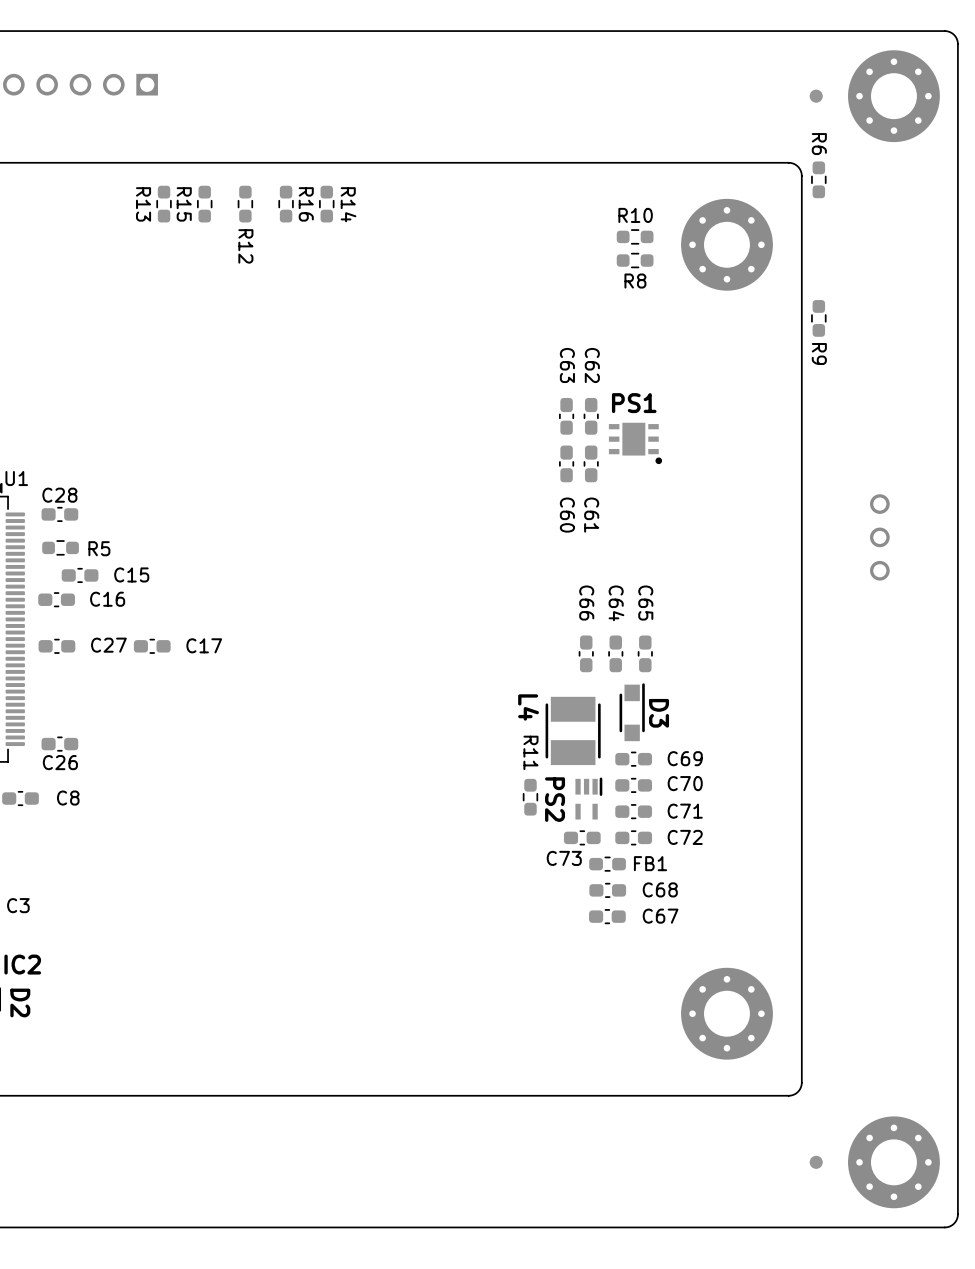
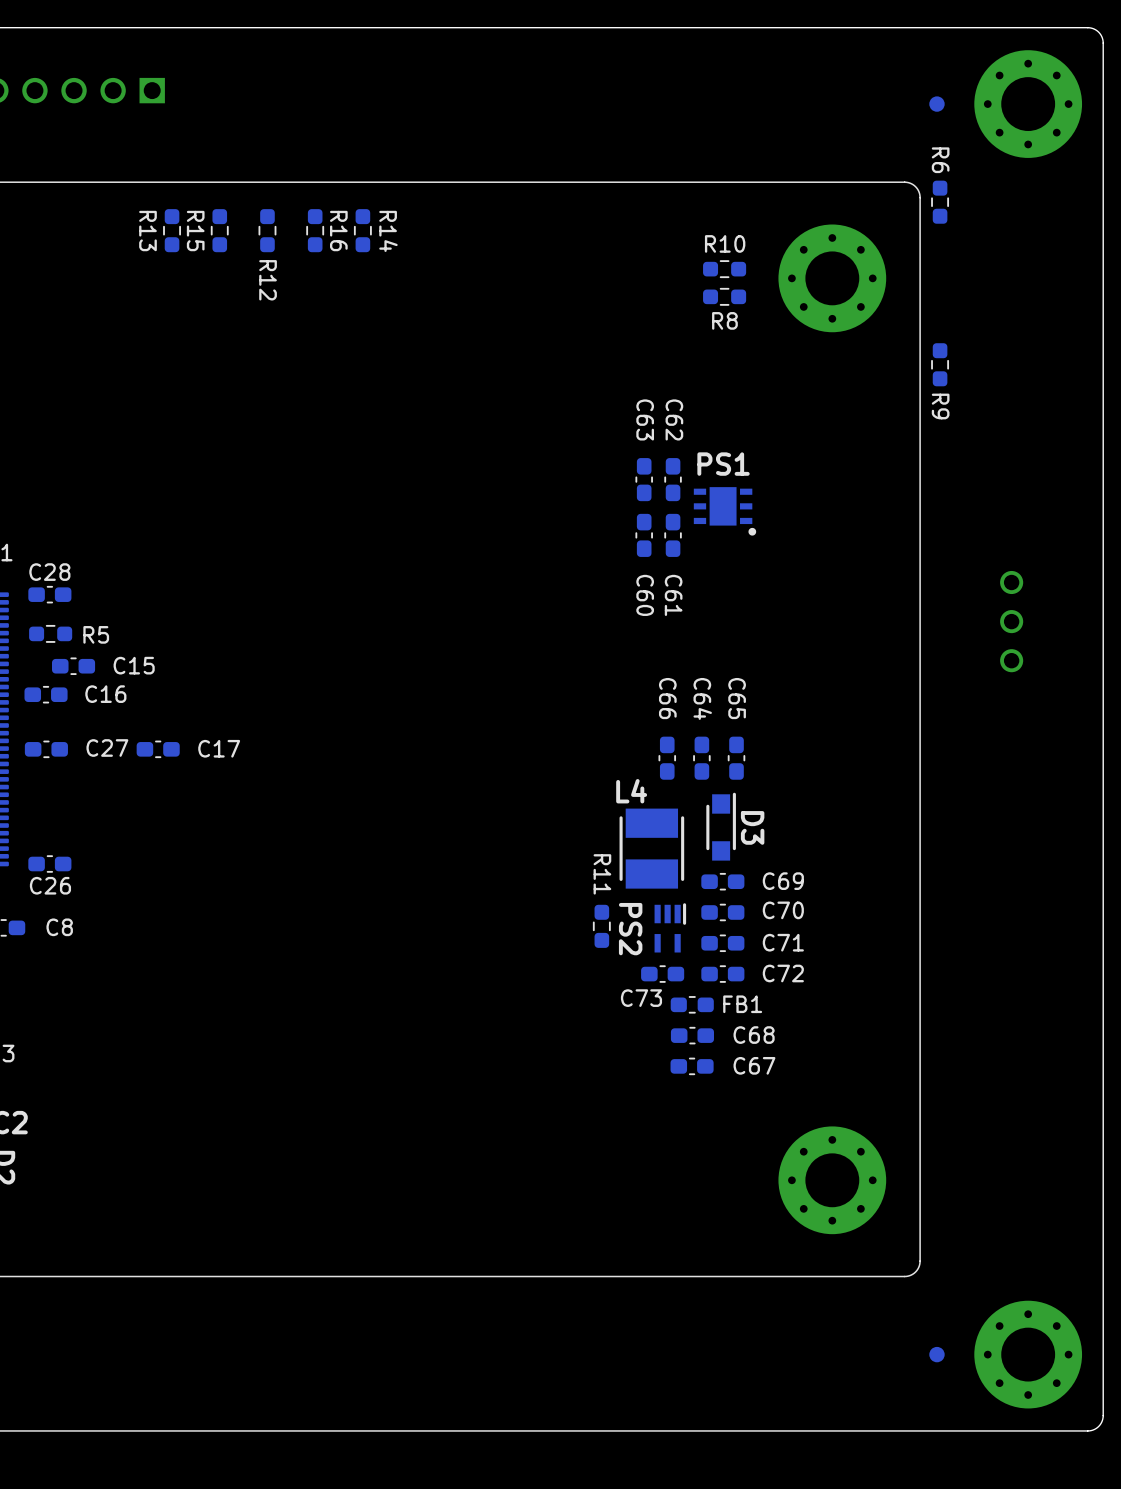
L4 name rotation: 0° (528, 707) -> 90° counterclockwise (631, 791)

